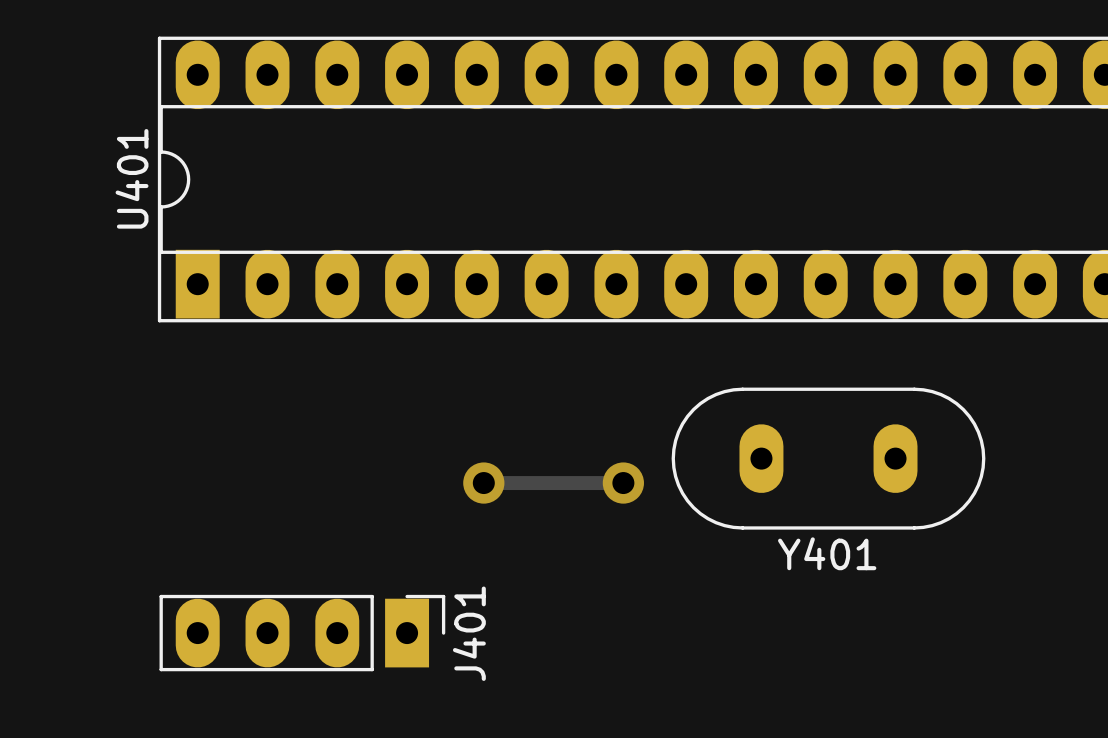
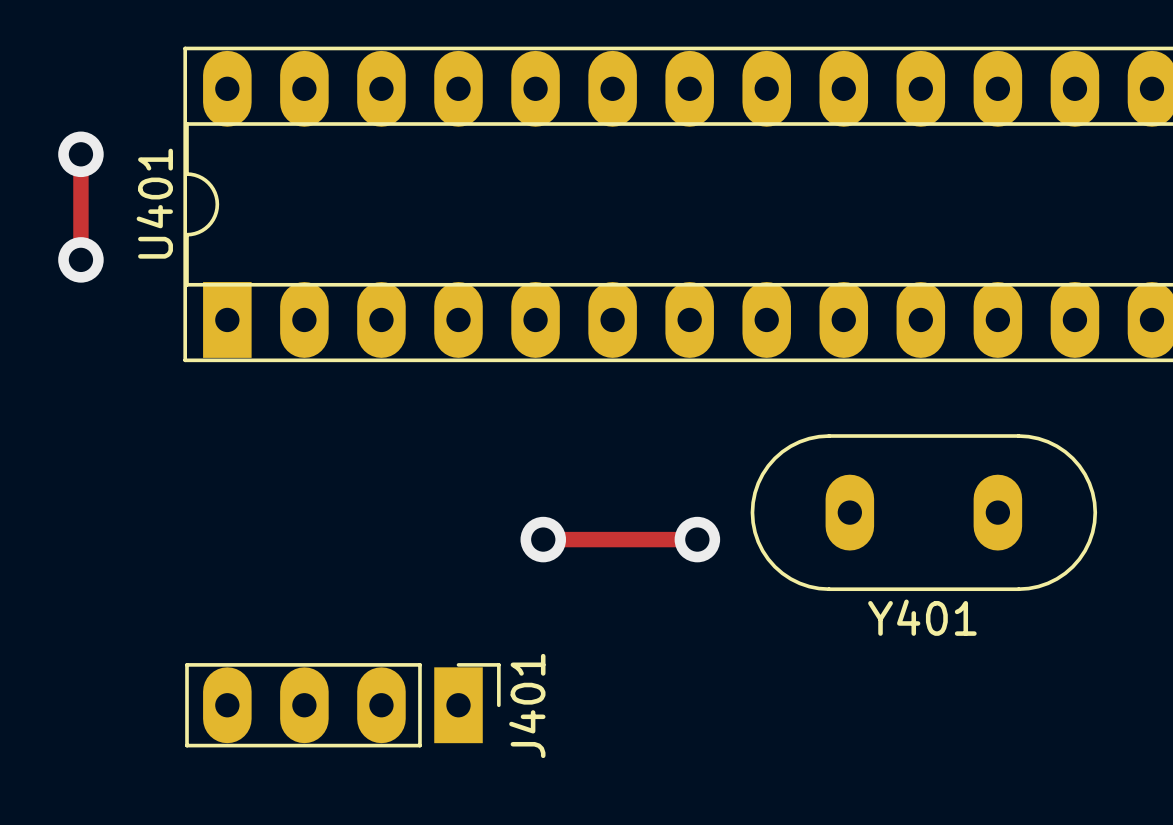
track: none -> (80, 154) (80, 259)
via: none -> (80, 154)
via: none -> (80, 259)

